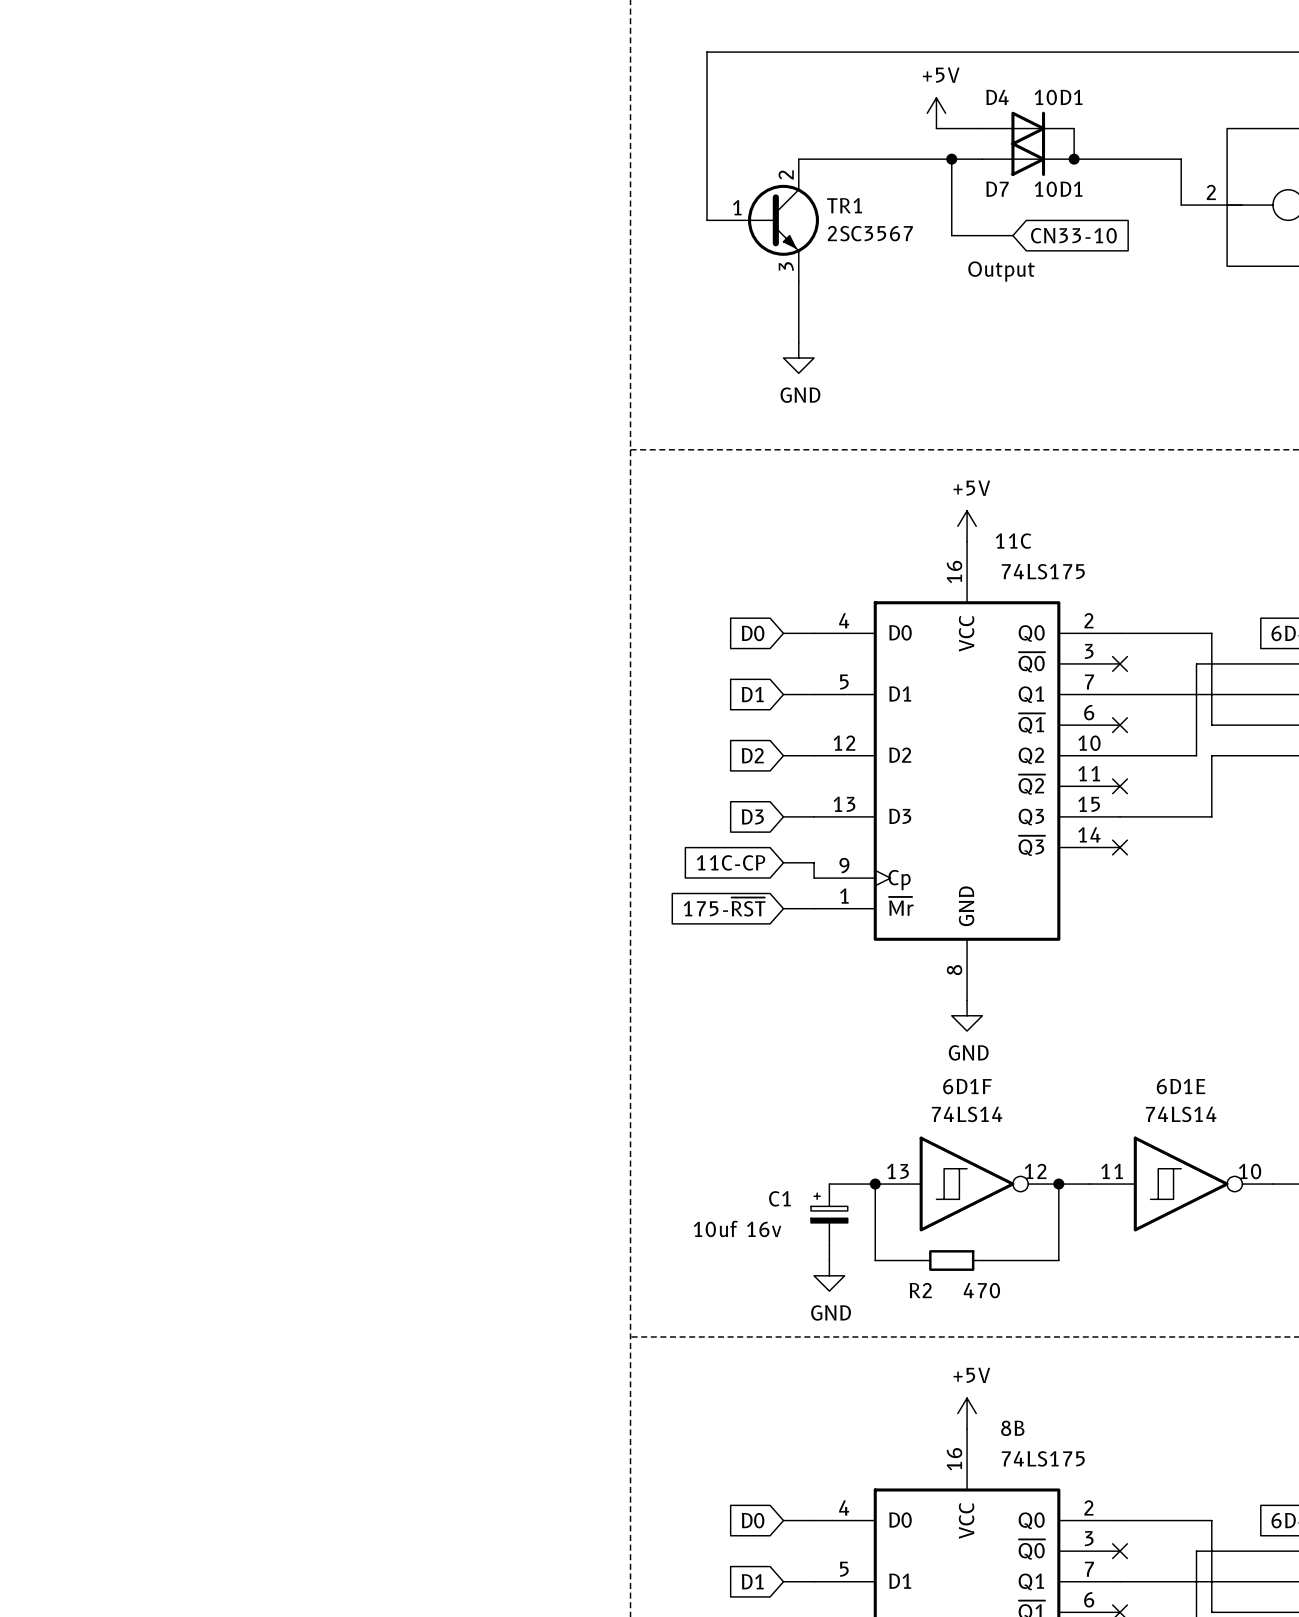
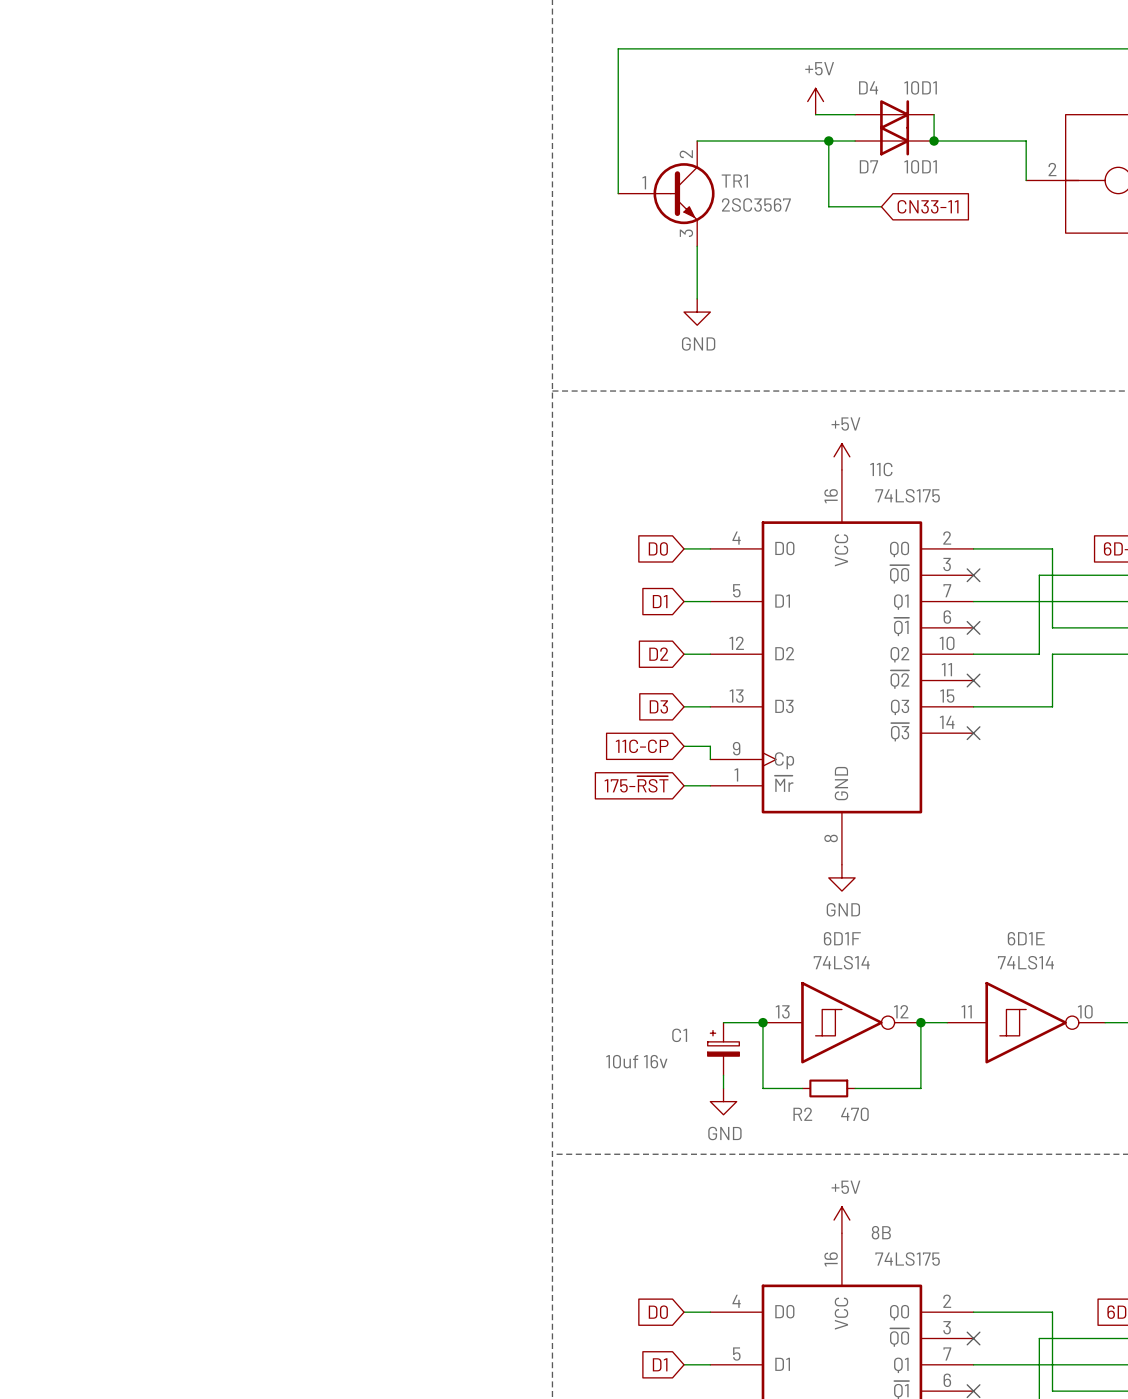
global label: CN33-10 (1073, 235) -> CN33-11 (928, 206)
text: Output (1001, 271) -> none

